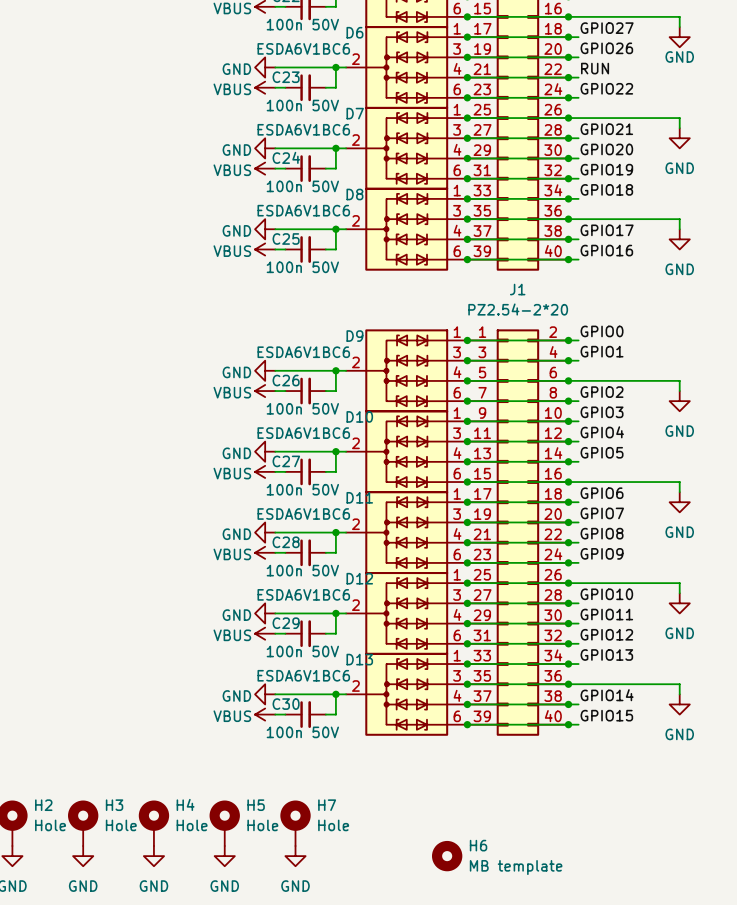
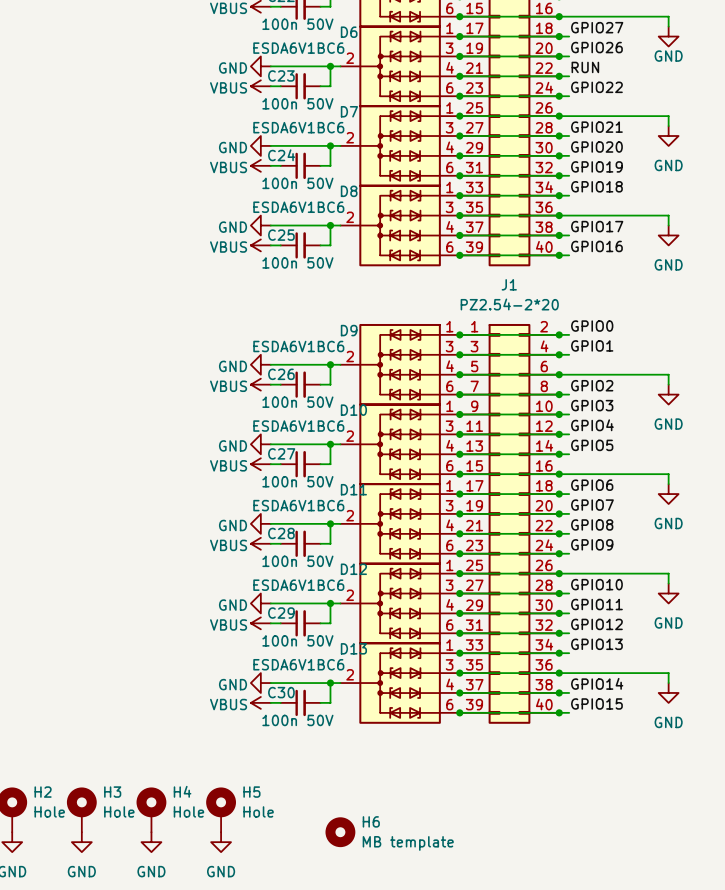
H7: Hole (295, 823) -> none
power symbol: GND (295, 856) -> none
H6 position: (447, 856) -> (340, 832)

